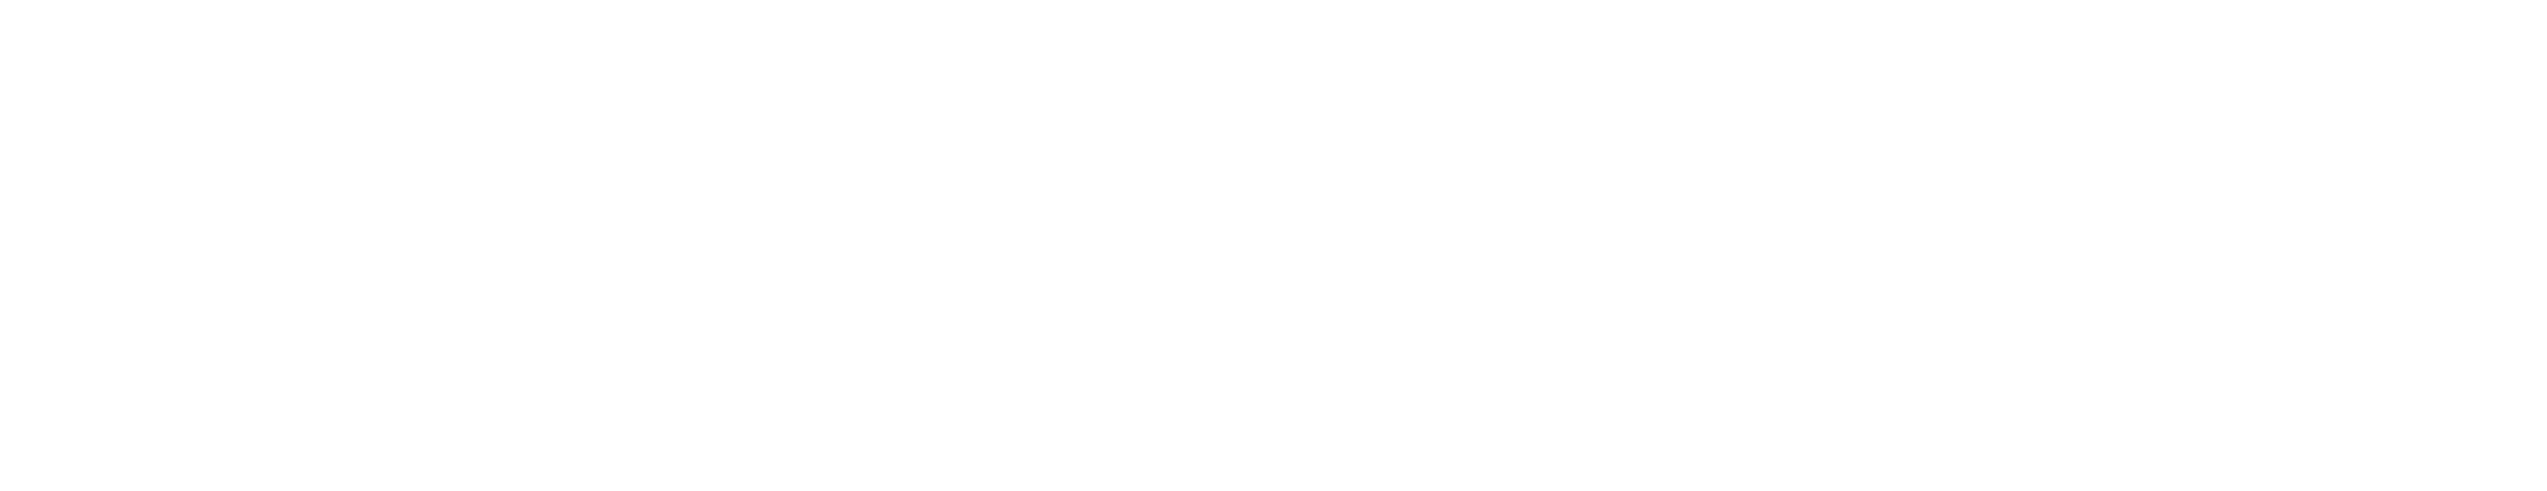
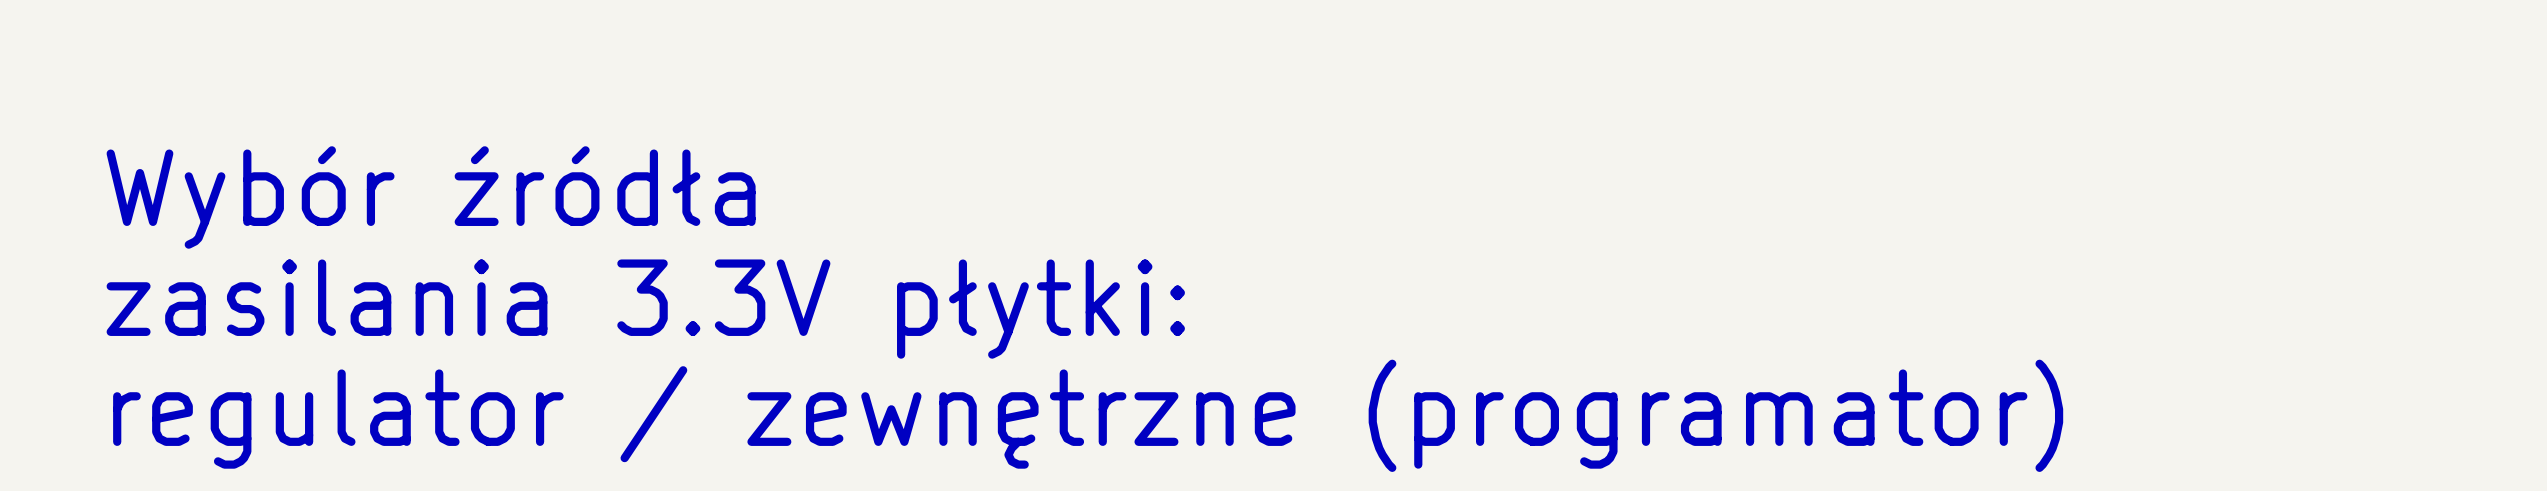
text: none -> Wybór źródła (431, 197)
text: none -> zasilania 3.3V płytki: (645, 309)
text: none -> regulator / zewnętrzne (programator) (1088, 415)

